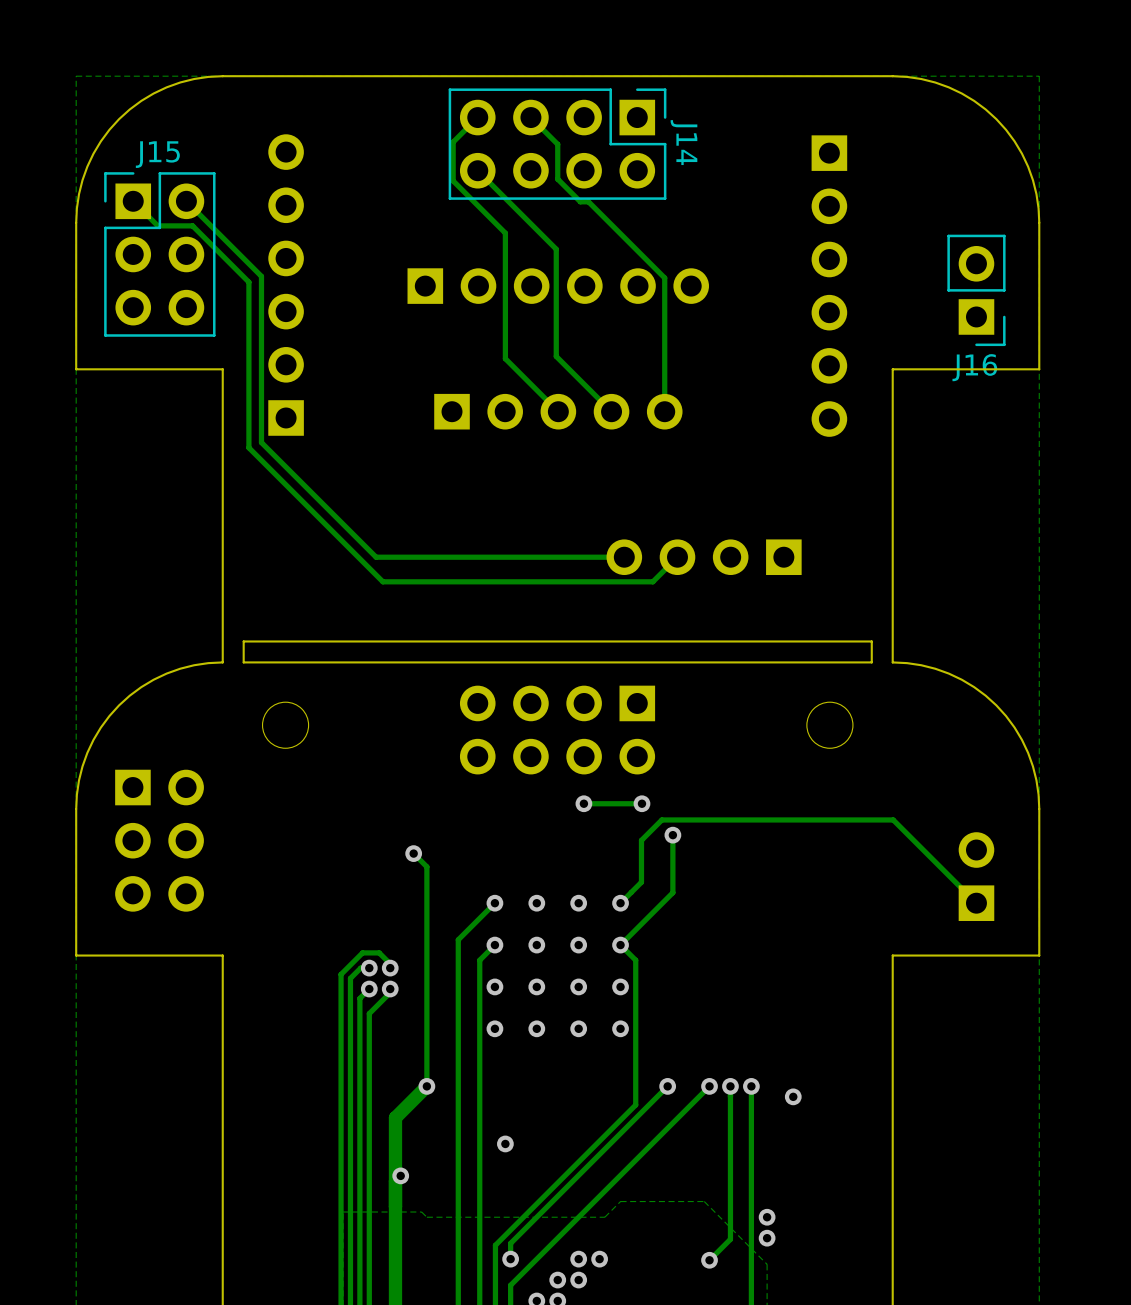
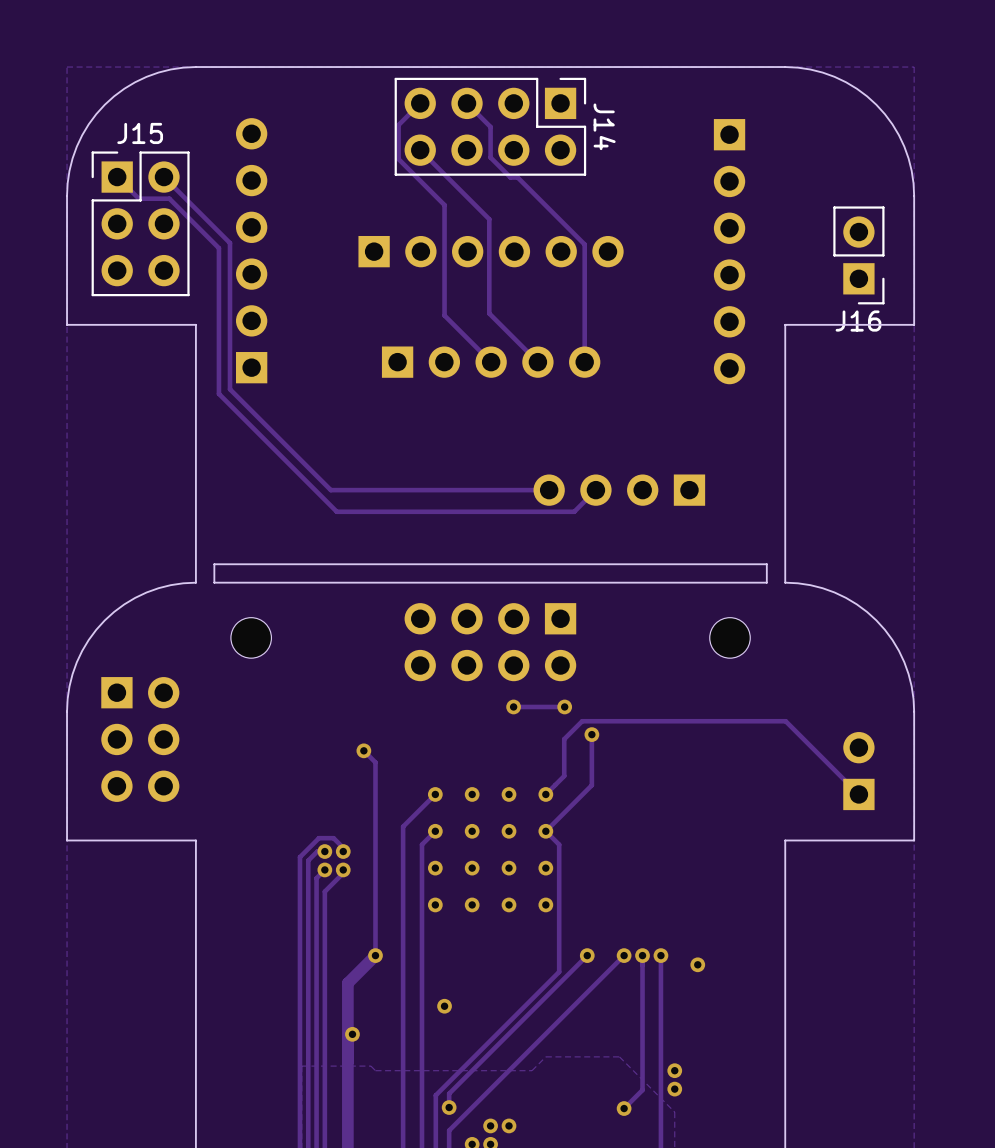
via: (578, 1259) -> none
via: (599, 1259) -> none

